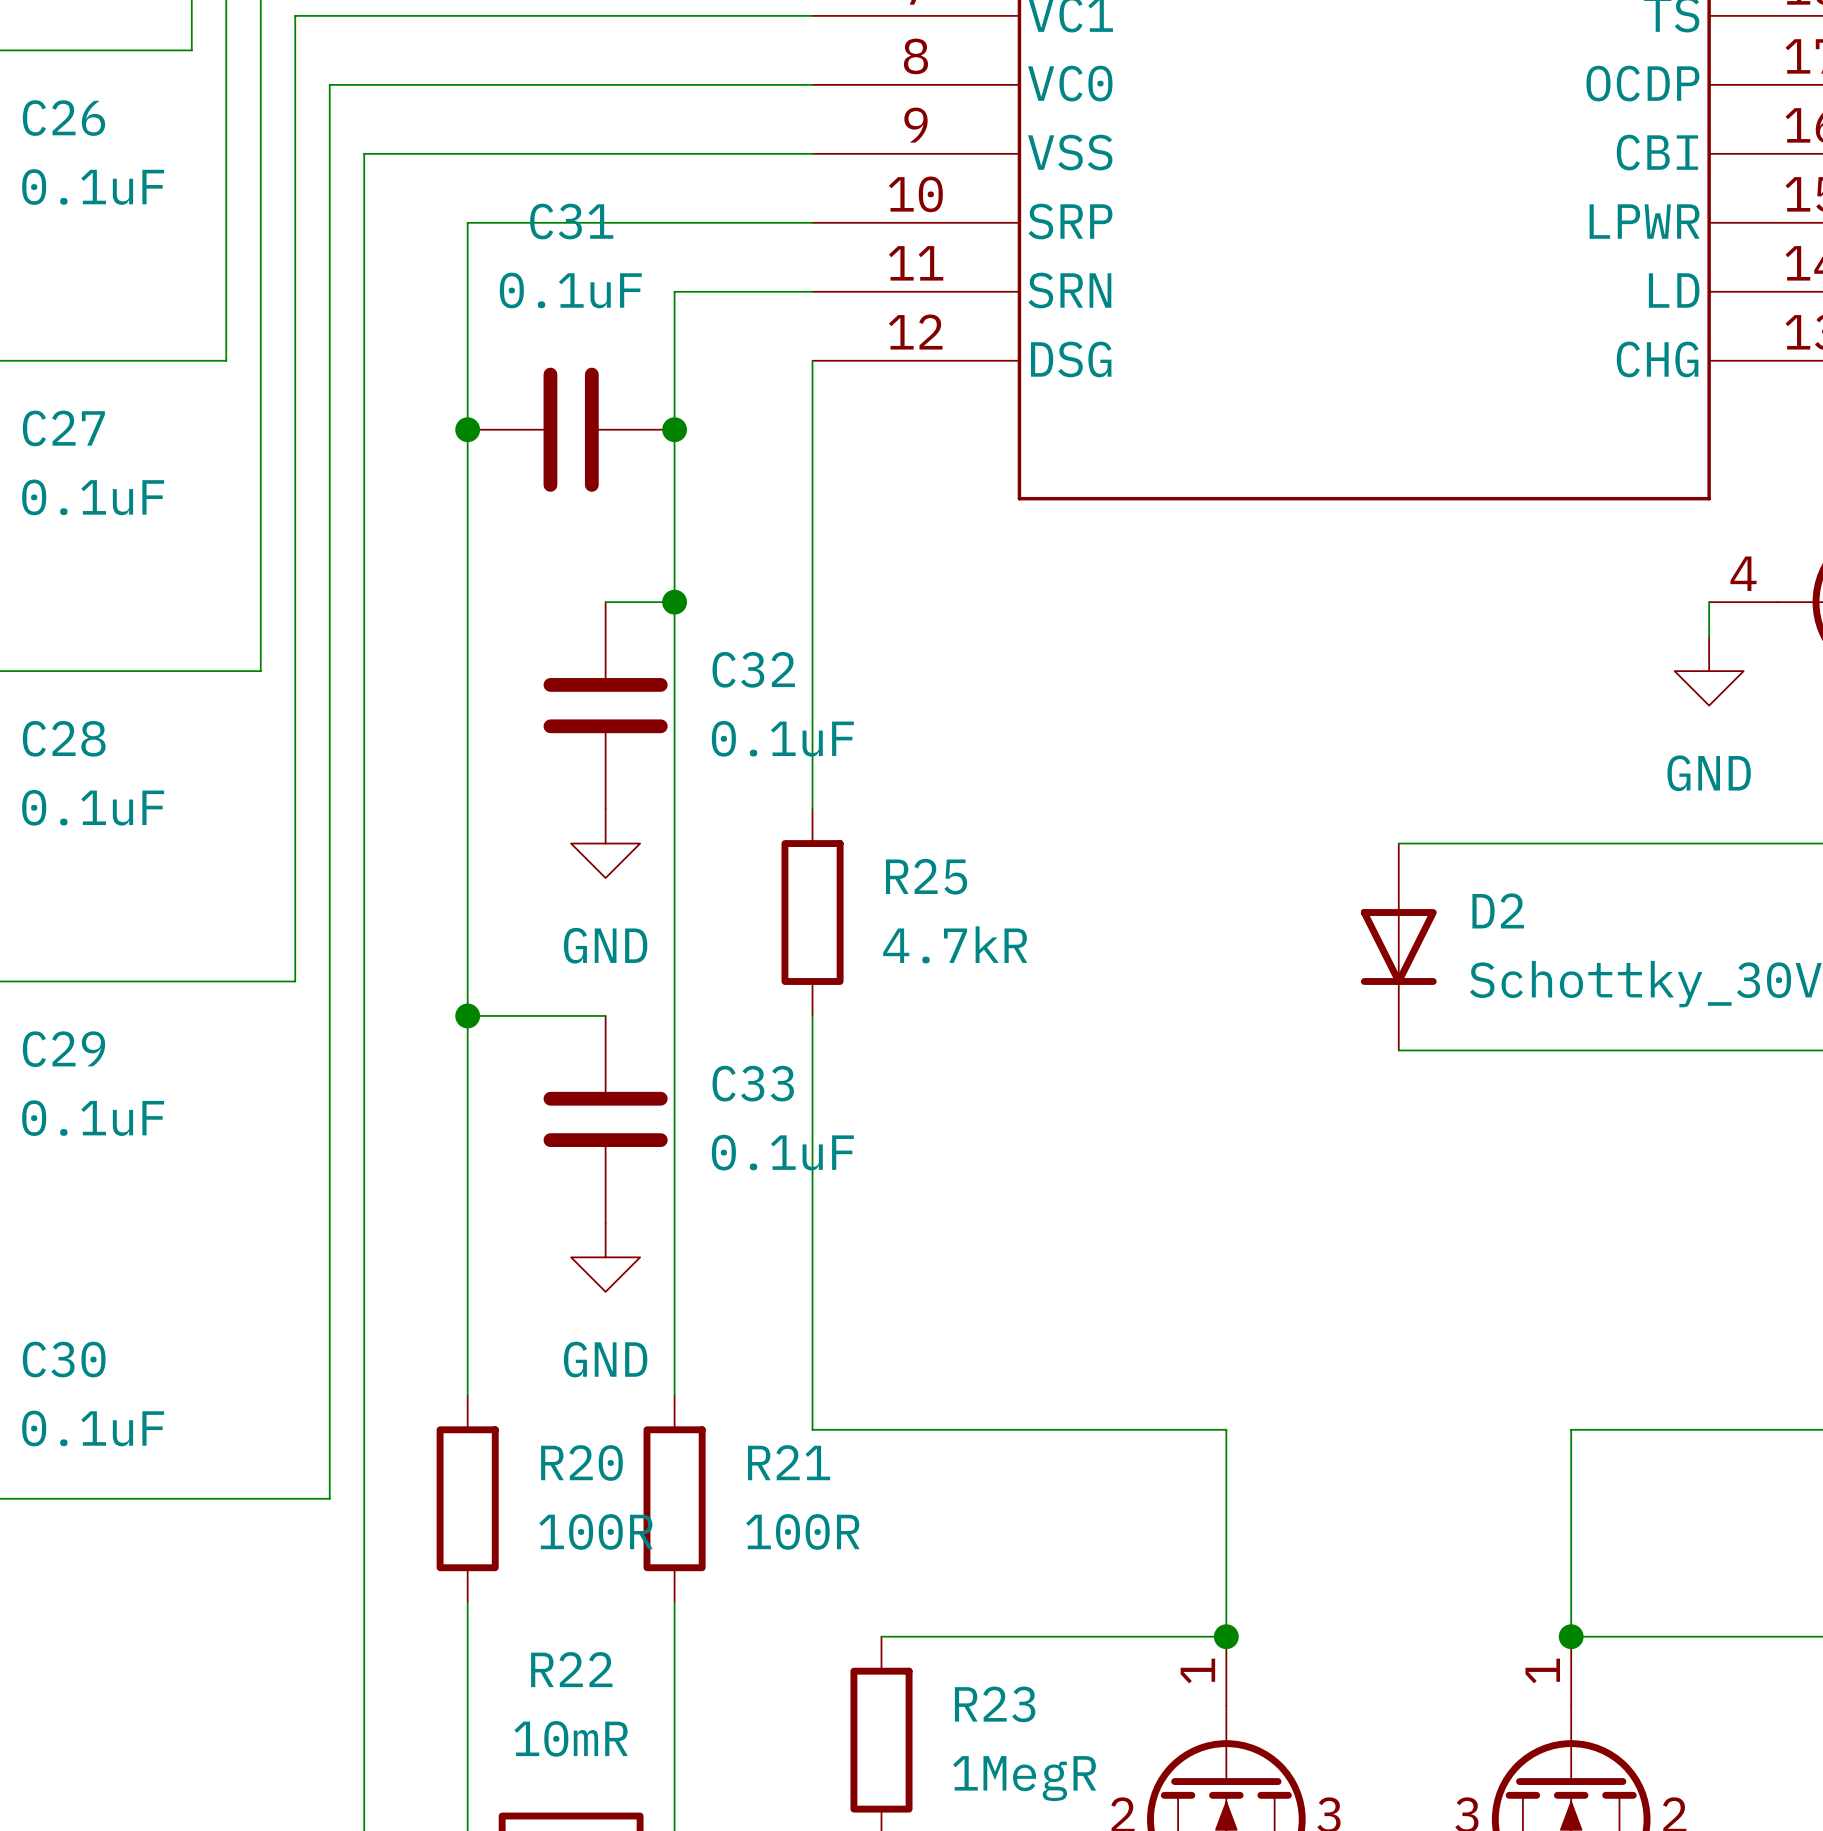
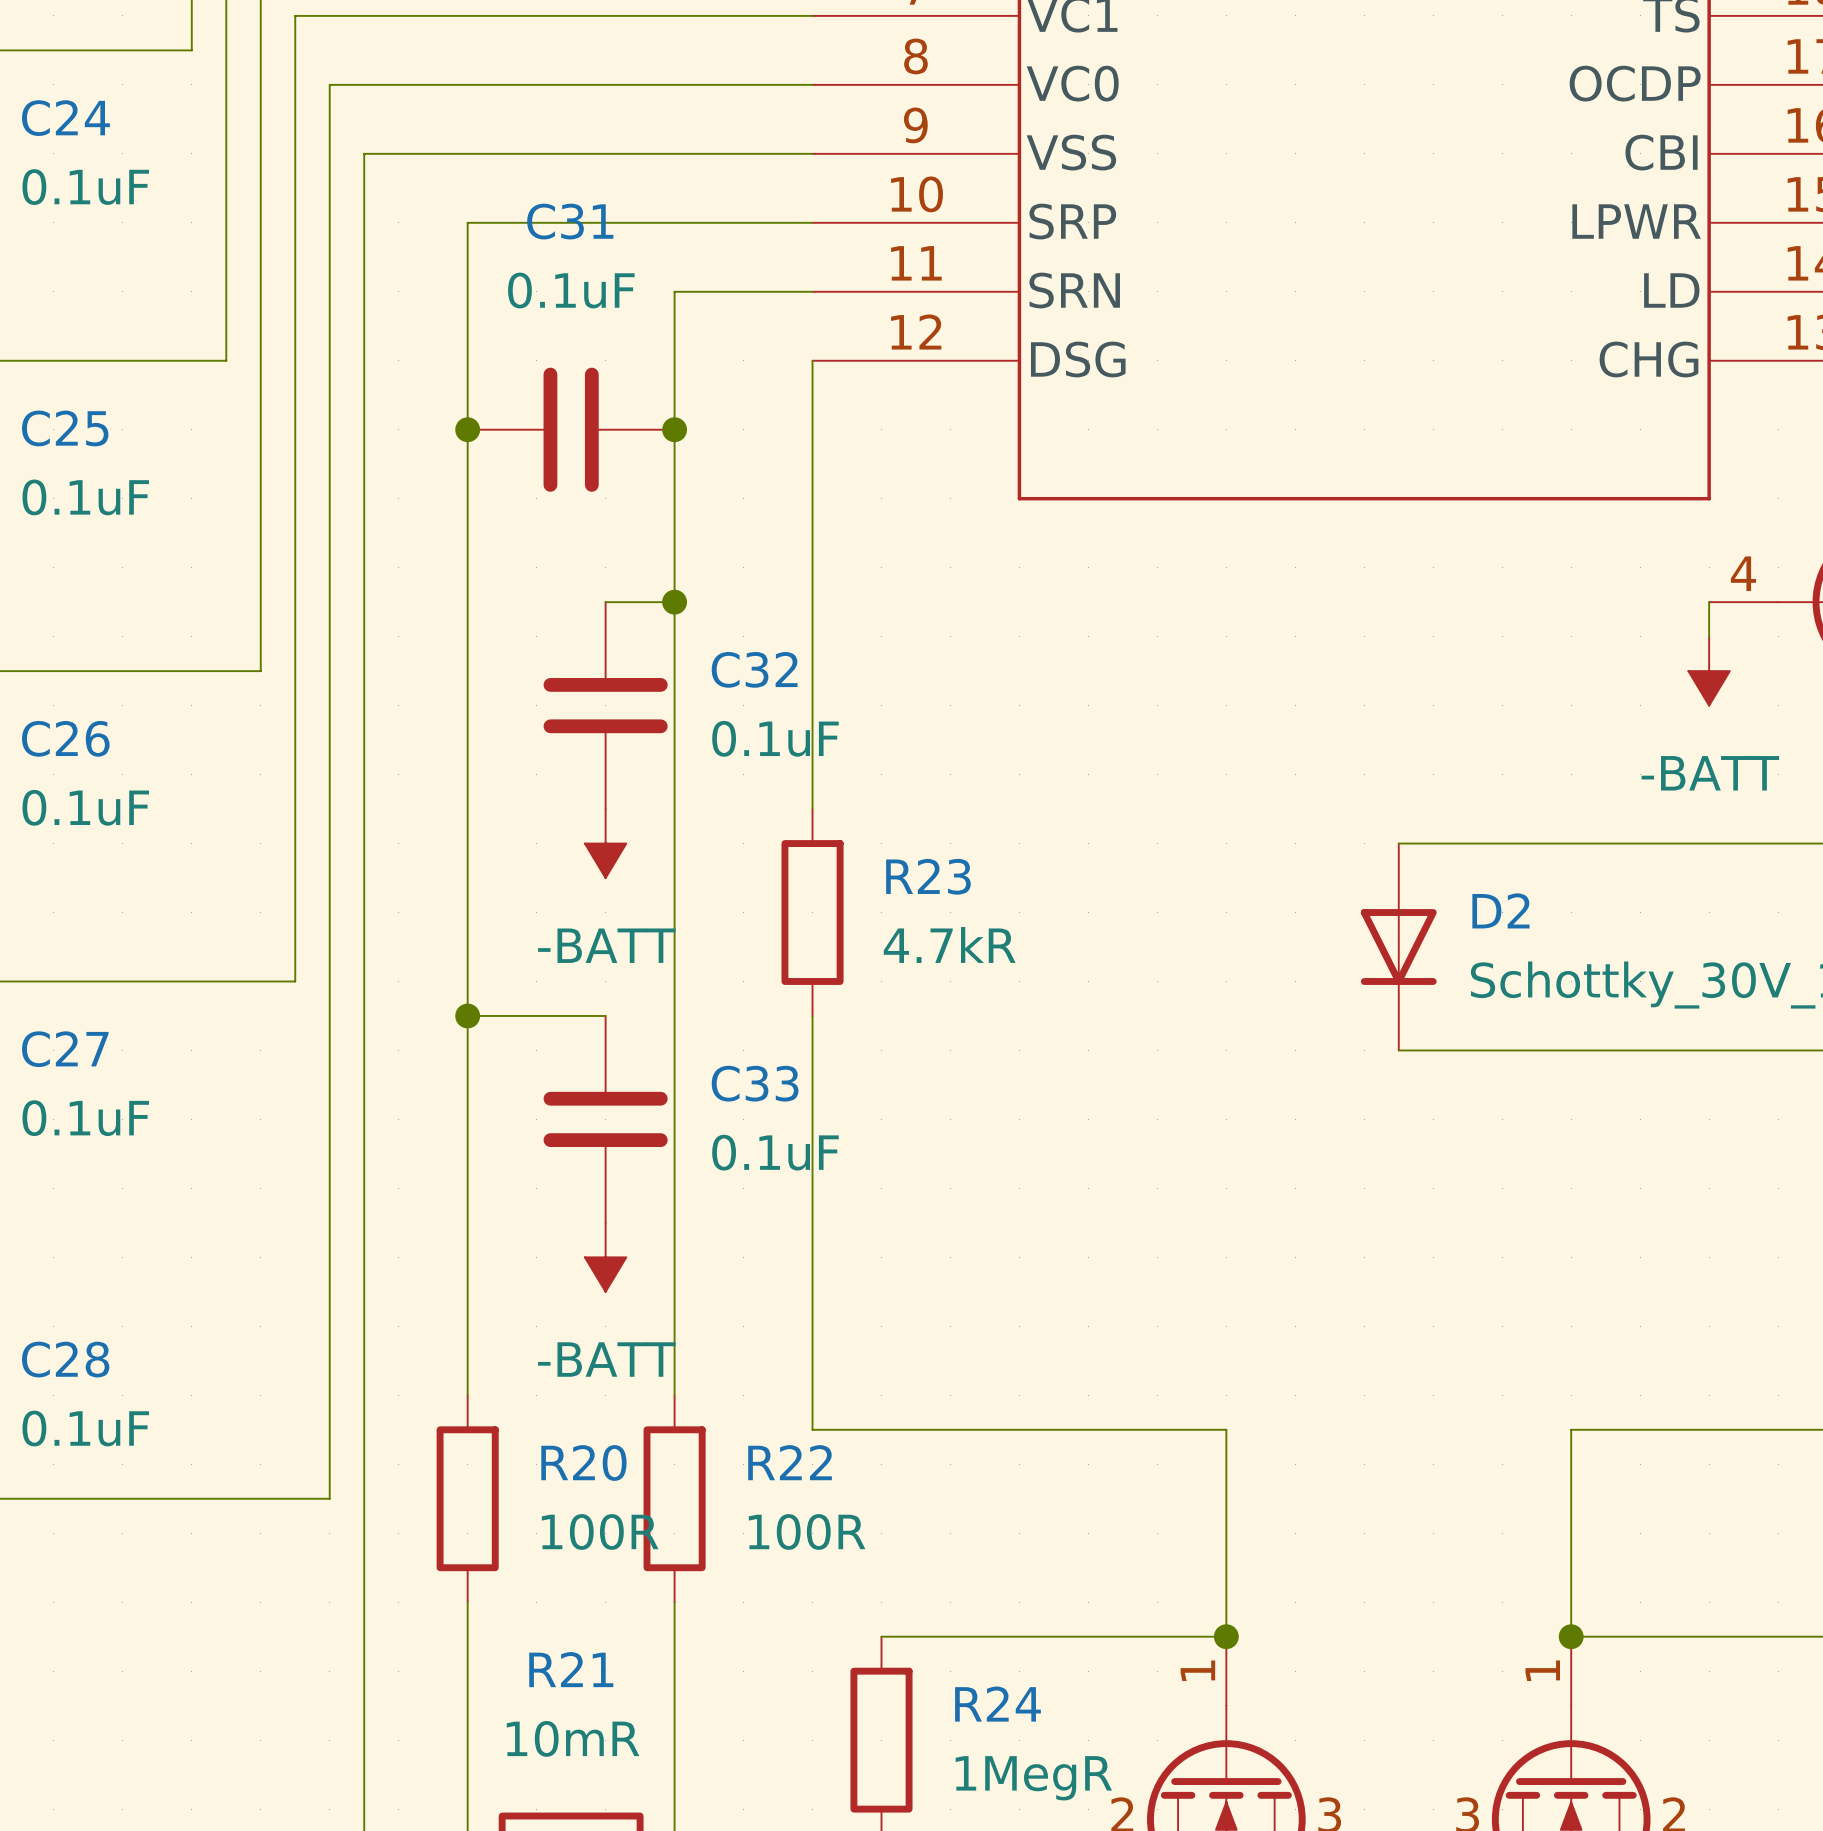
C26 name: C26 (63, 118) -> C24 (65, 118)
C27 name: C27 (63, 428) -> C25 (65, 428)
power symbol: GND (1709, 671) -> -BATT (1709, 671)
C28 name: C28 (64, 738) -> C26 (65, 738)
power symbol: GND (605, 843) -> -BATT (605, 843)
R25 name: R25 (926, 876) -> R23 (928, 876)
C29 name: C29 (63, 1049) -> C27 (65, 1049)
power symbol: GND (605, 1257) -> -BATT (605, 1257)
C30 name: C30 (64, 1359) -> C28 (65, 1359)
R21 name: R21 (789, 1462) -> R22 (790, 1462)
R22 name: R22 (571, 1669) -> R21 (571, 1669)
R23 name: R23 (995, 1704) -> R24 (997, 1704)

